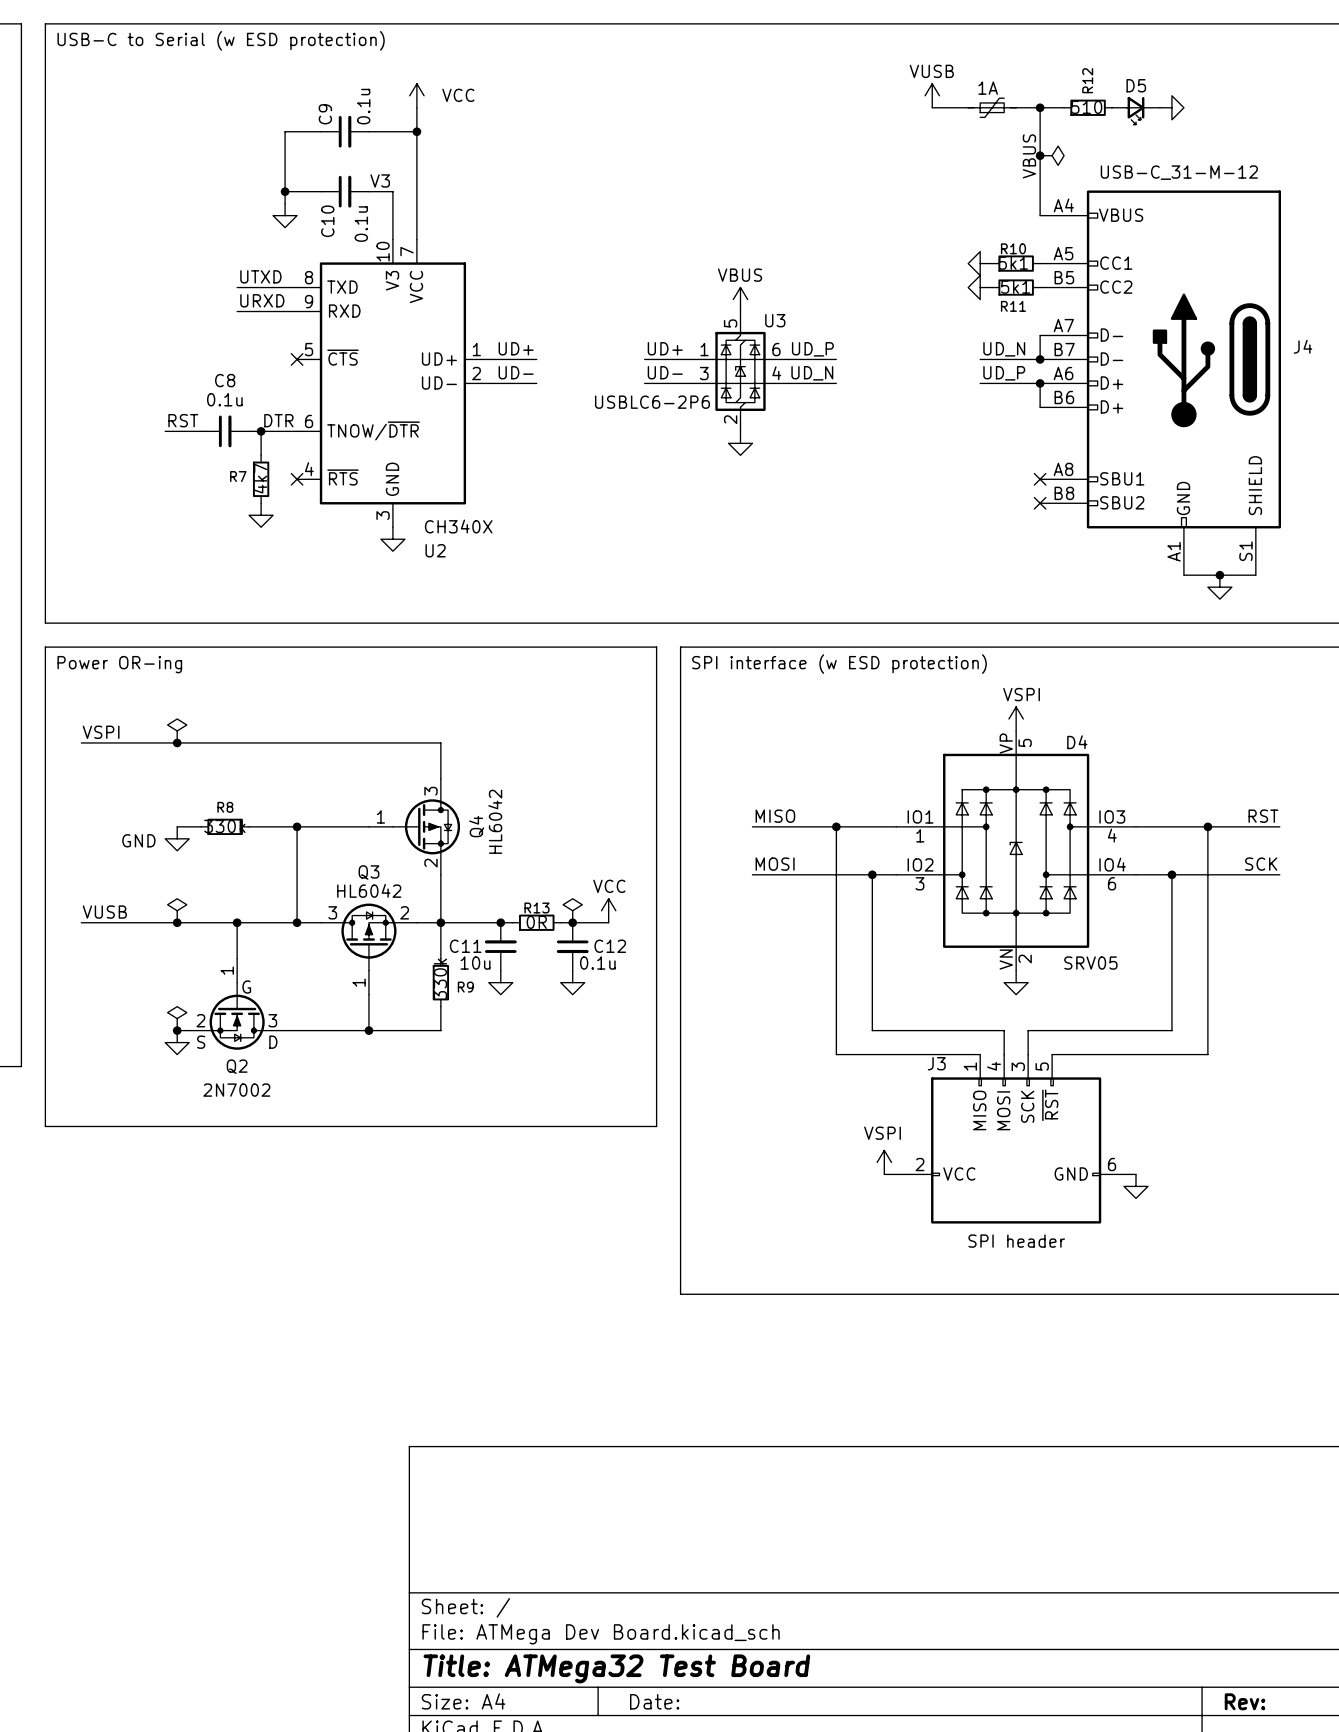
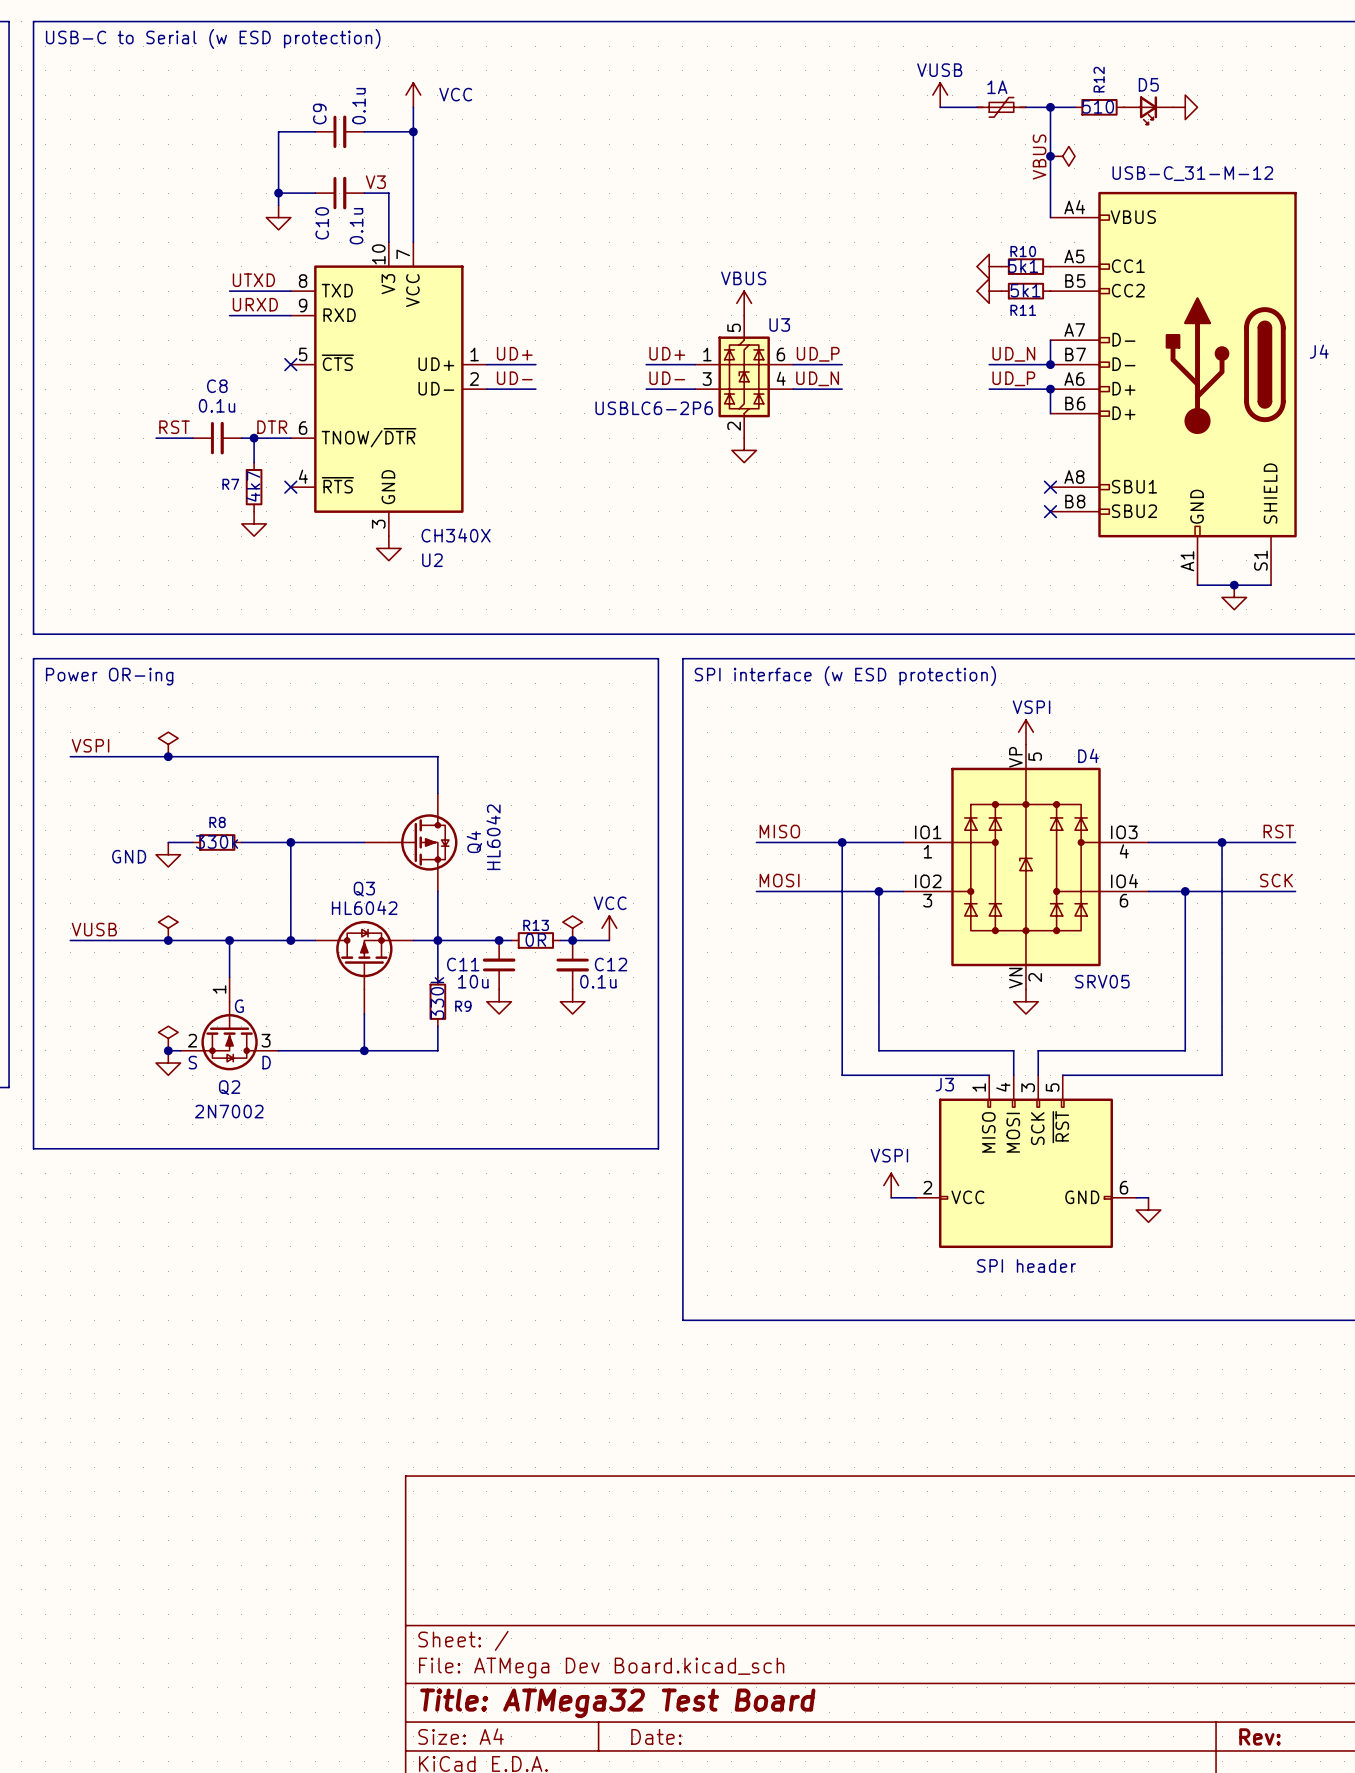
Q4 pin number: 3 (430, 791) -> none
Q4 pin number: 1 (380, 816) -> none
Q4 pin number: 2 (430, 863) -> none
Q3 pin number: 3 (332, 912) -> none
Q3 pin number: 2 (404, 912) -> none
Q3 pin number: 1 (359, 982) -> none

